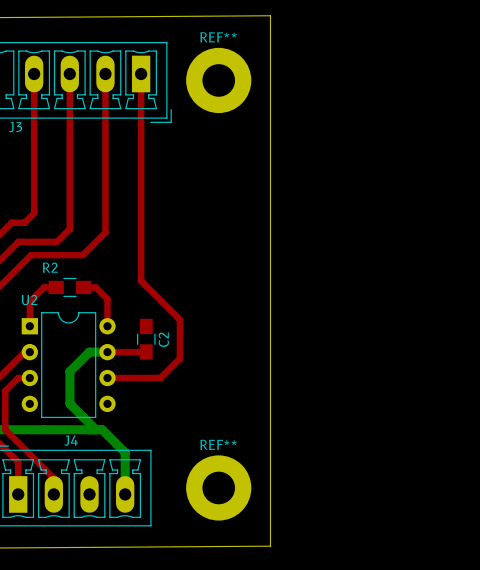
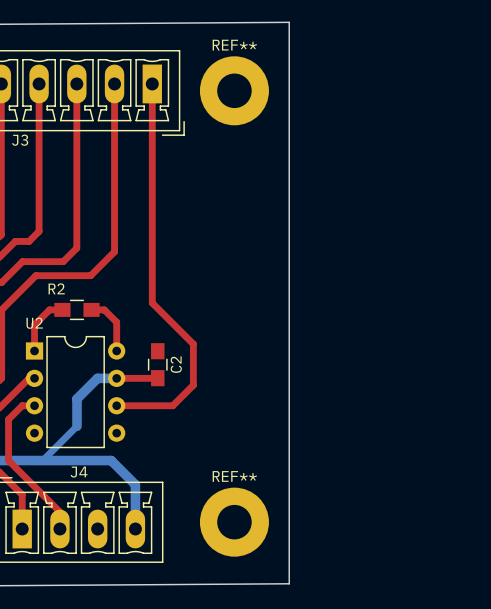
bottom track: (69, 397) (69, 403) (95, 429) -> (76, 426) (42, 460)

